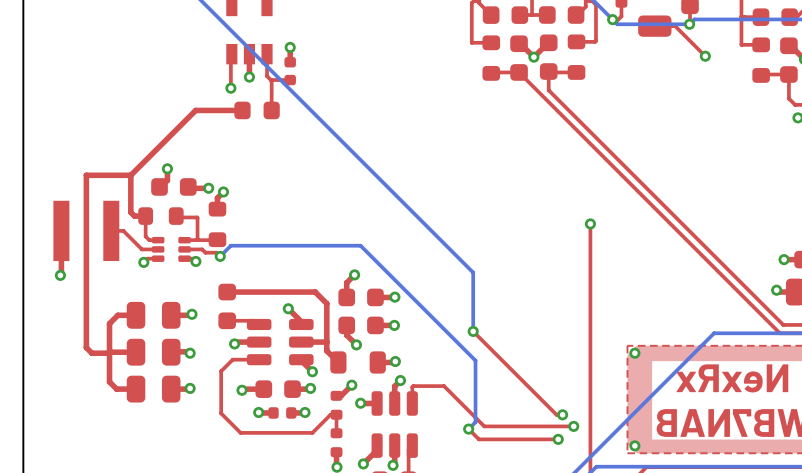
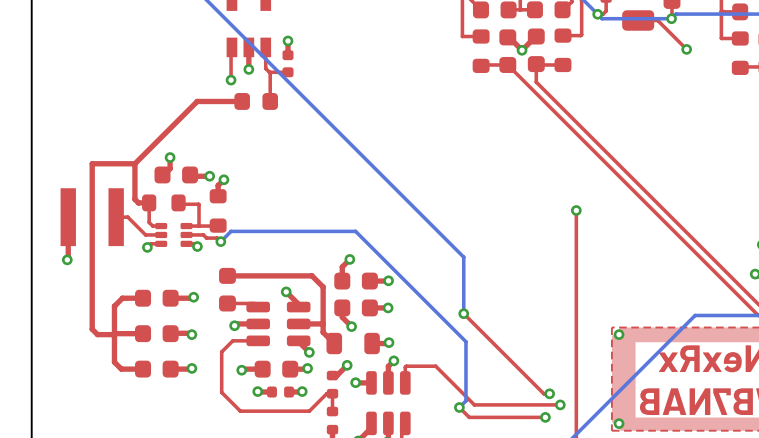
part footprint: [126, 301, 181, 329] -> [135, 289, 179, 307]
part footprint: [126, 338, 181, 366] -> [135, 325, 179, 343]
part footprint: [126, 375, 181, 403] -> [135, 360, 179, 378]

